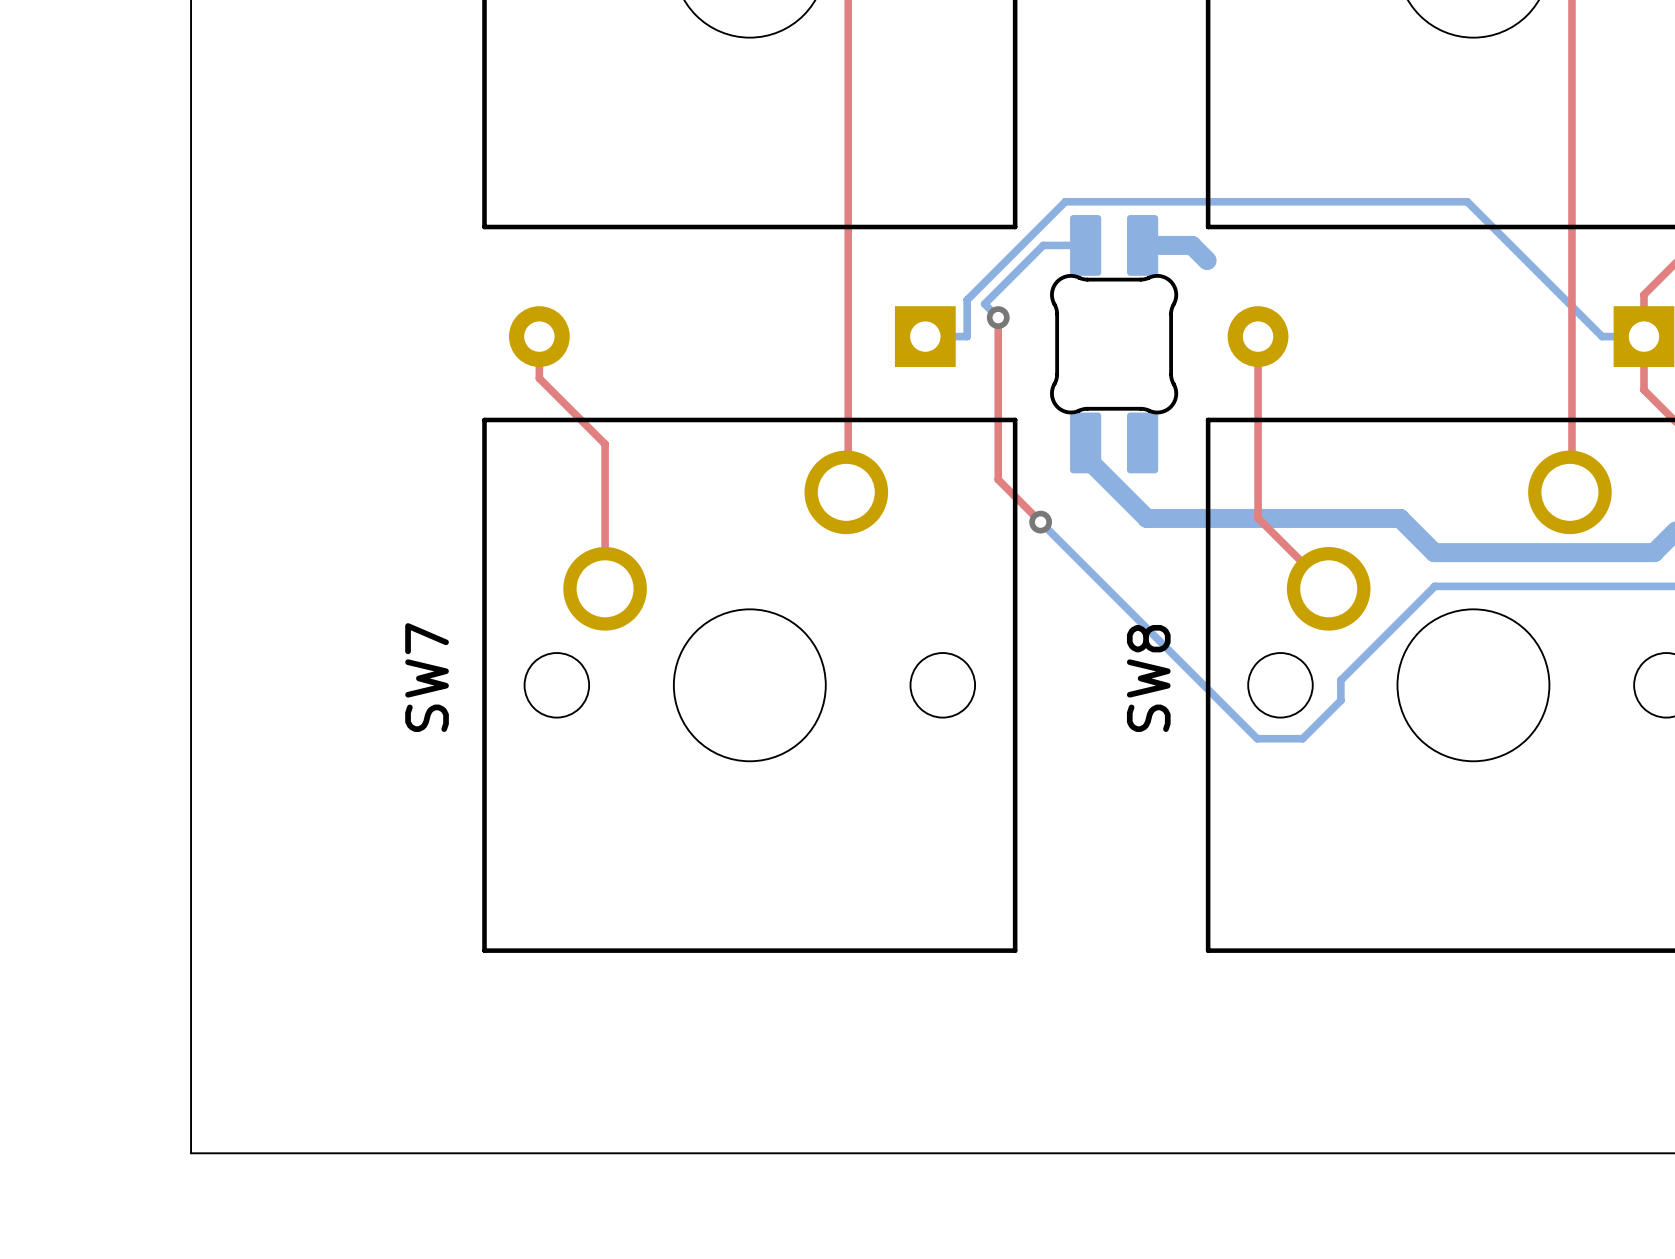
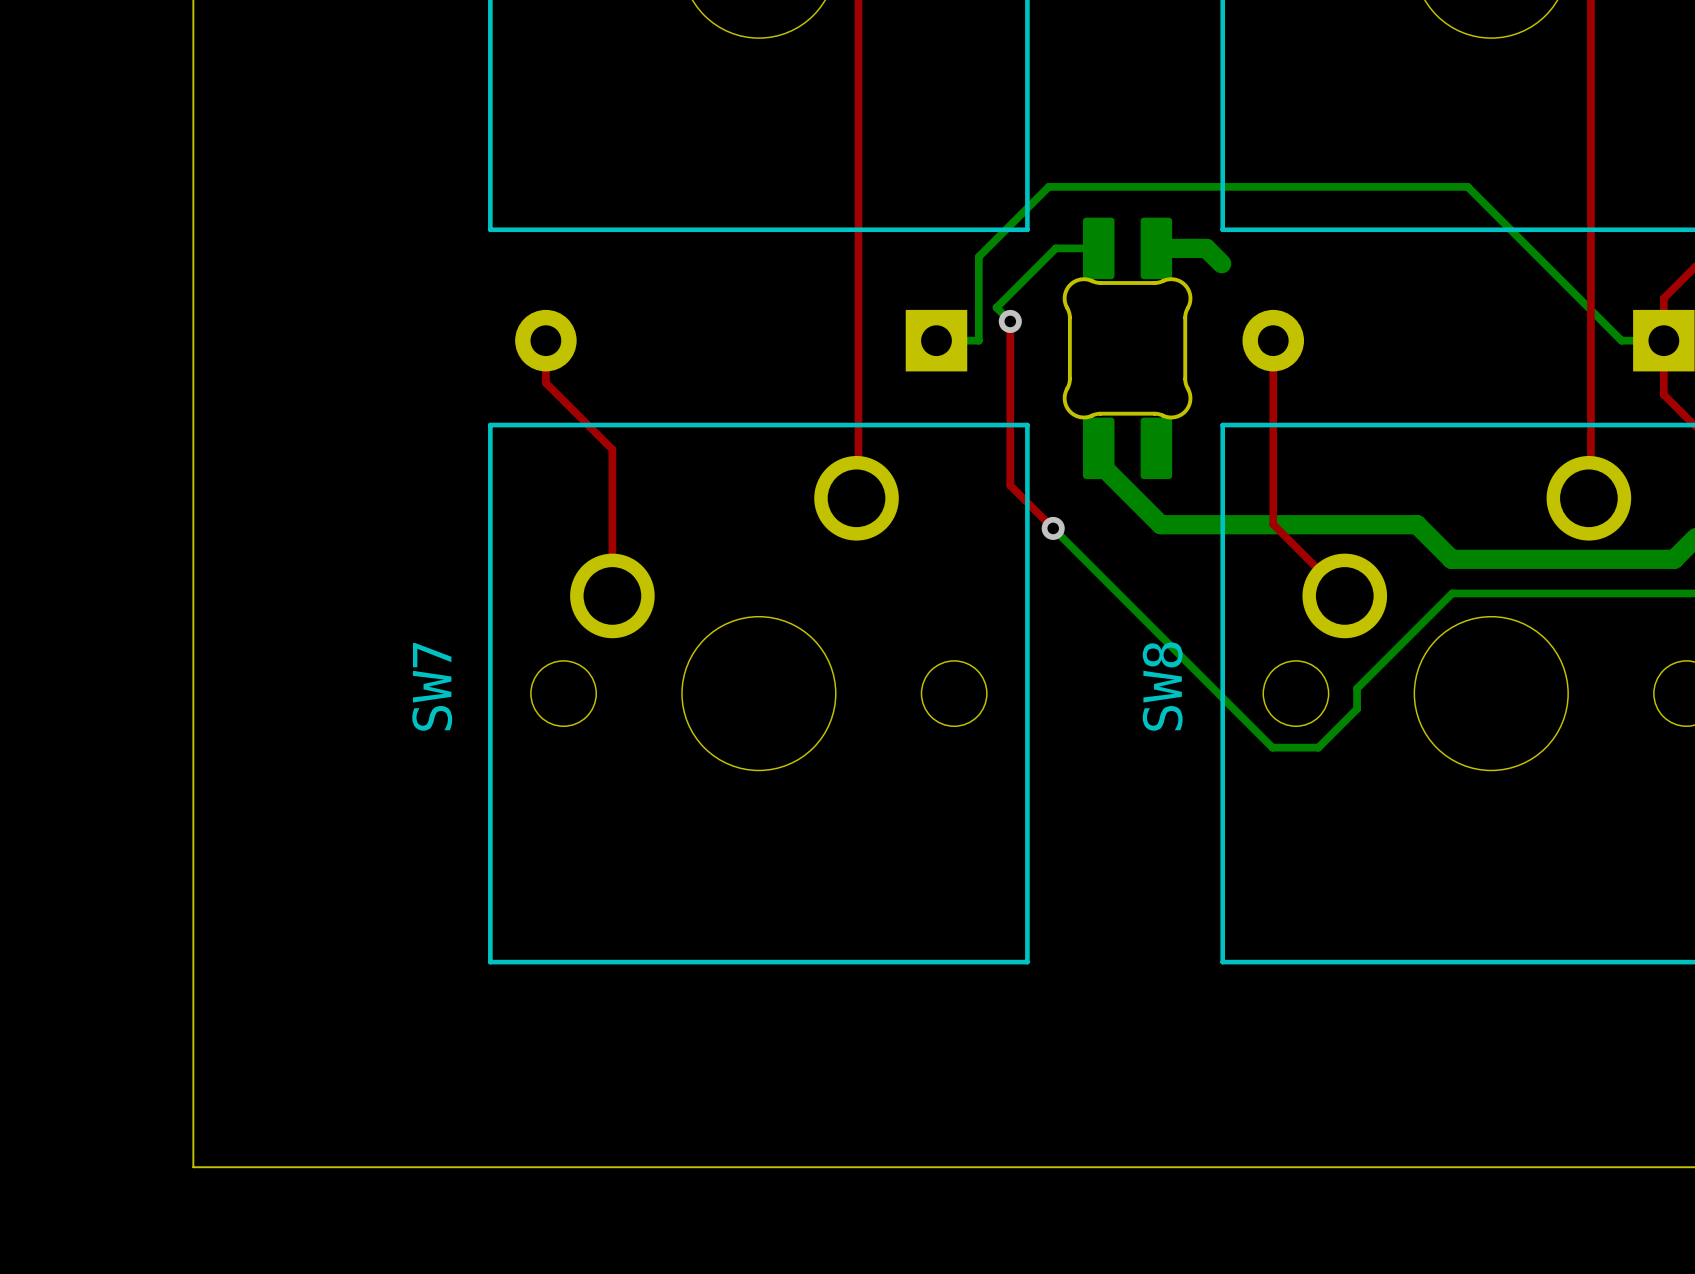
bottom track: (1467, 201) (1065, 201) (967, 299) -> (1485, 204) (1467, 186) (1048, 186) (978, 256) (978, 303)

